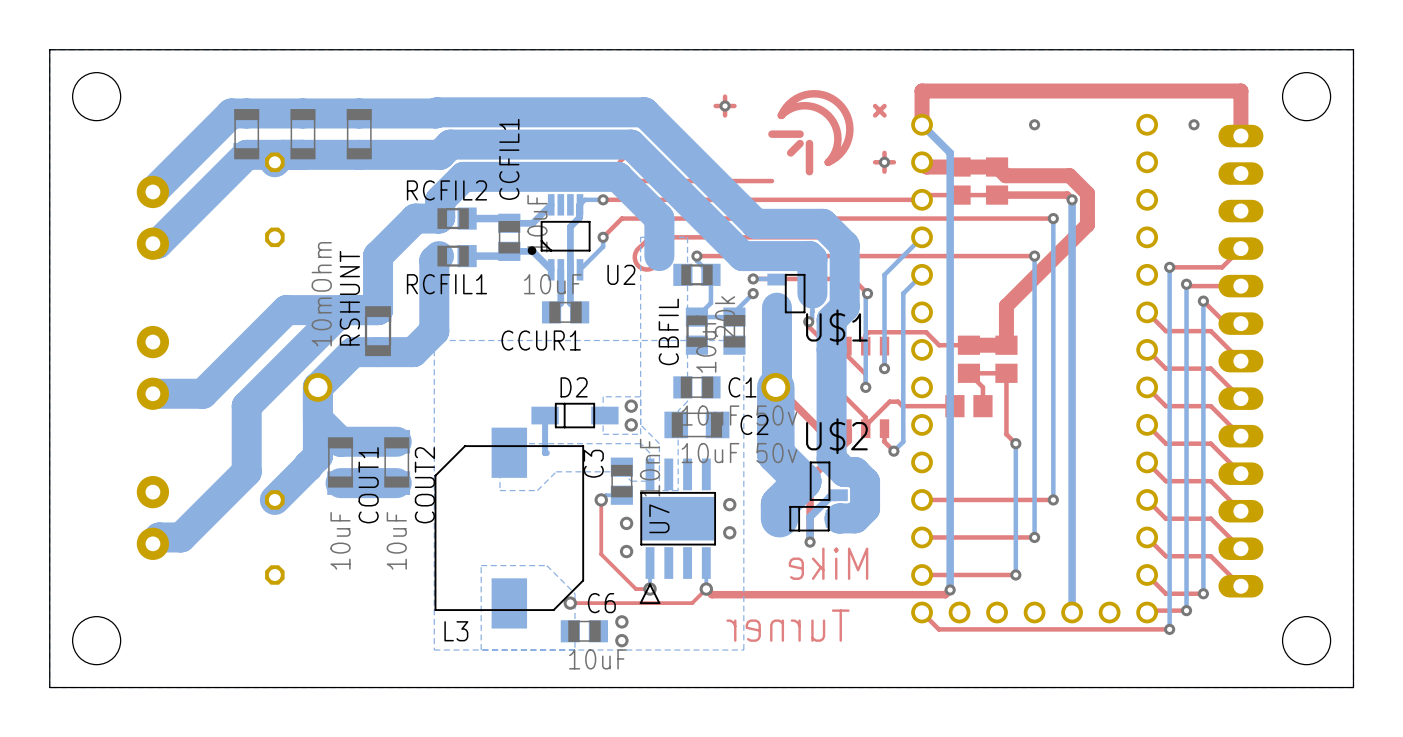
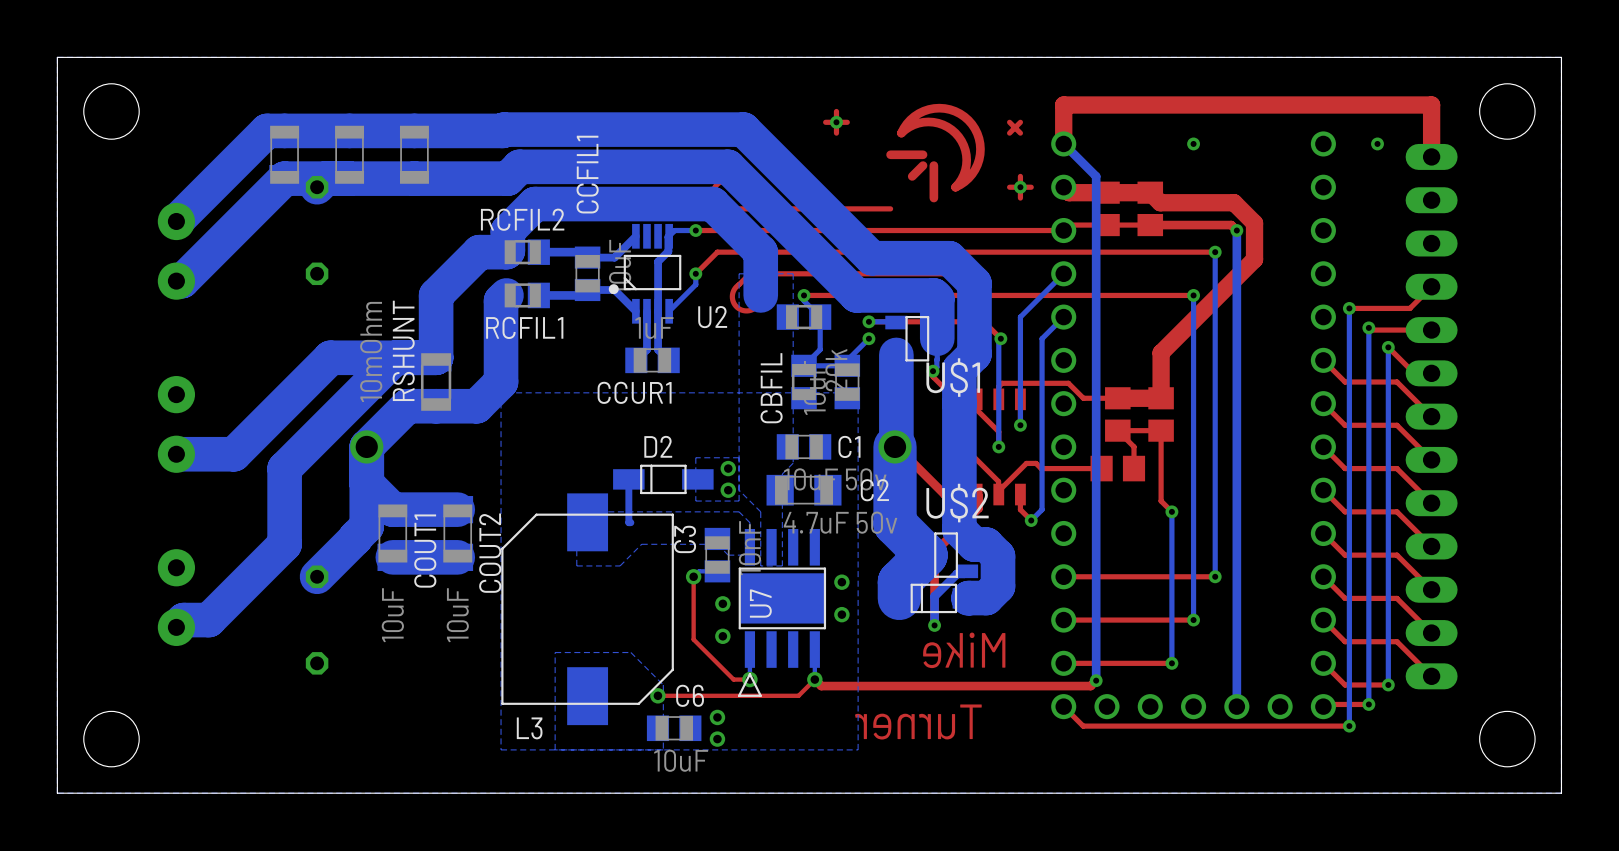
CCUR1 value: 10uF (552, 284) -> 1uF (654, 328)
C2 value: 10uF 50v (739, 453) -> 4.7uF 50v (840, 522)

